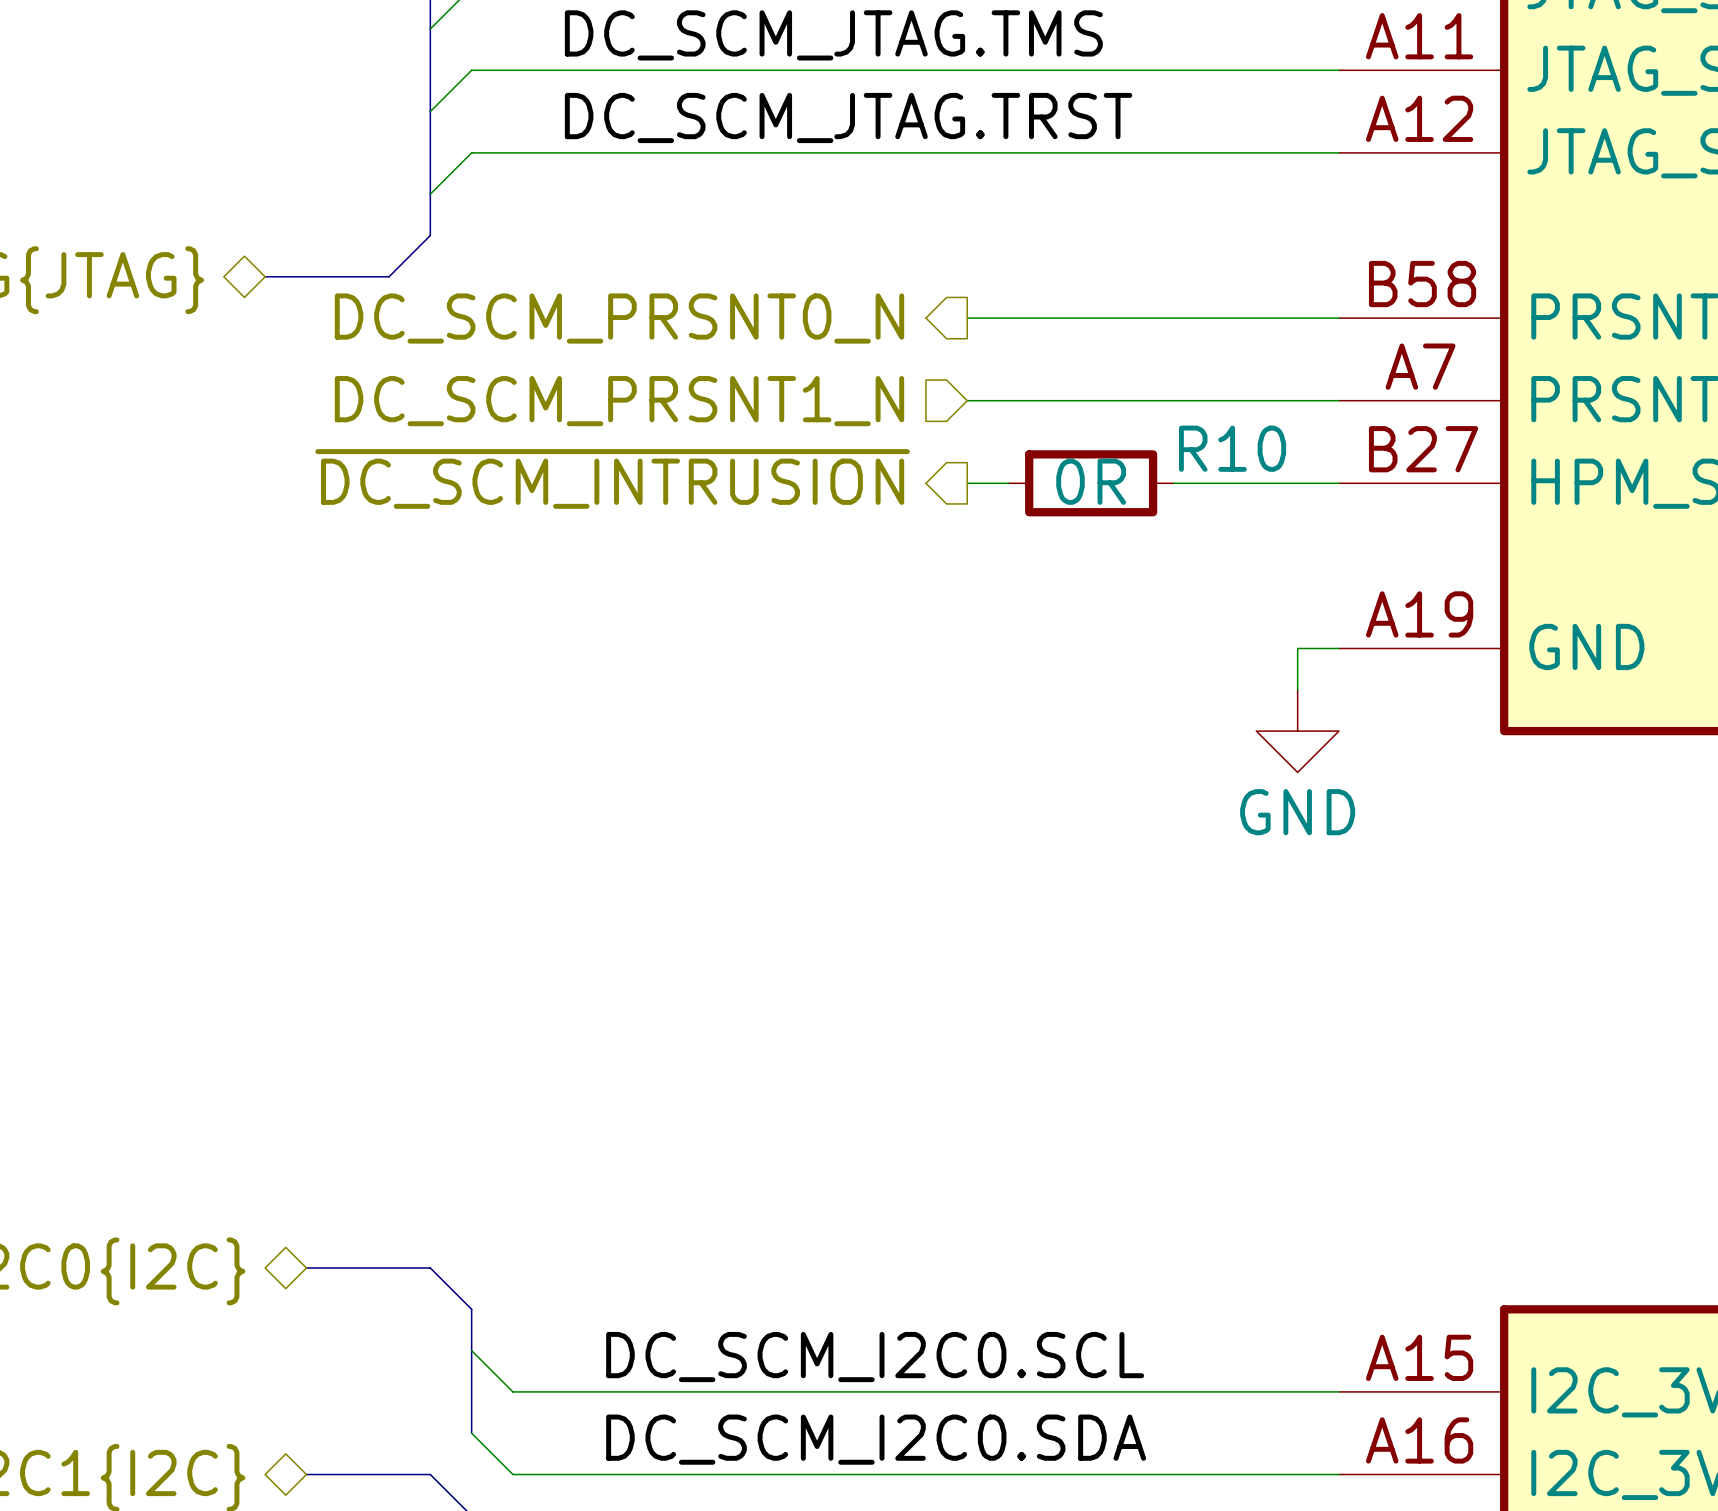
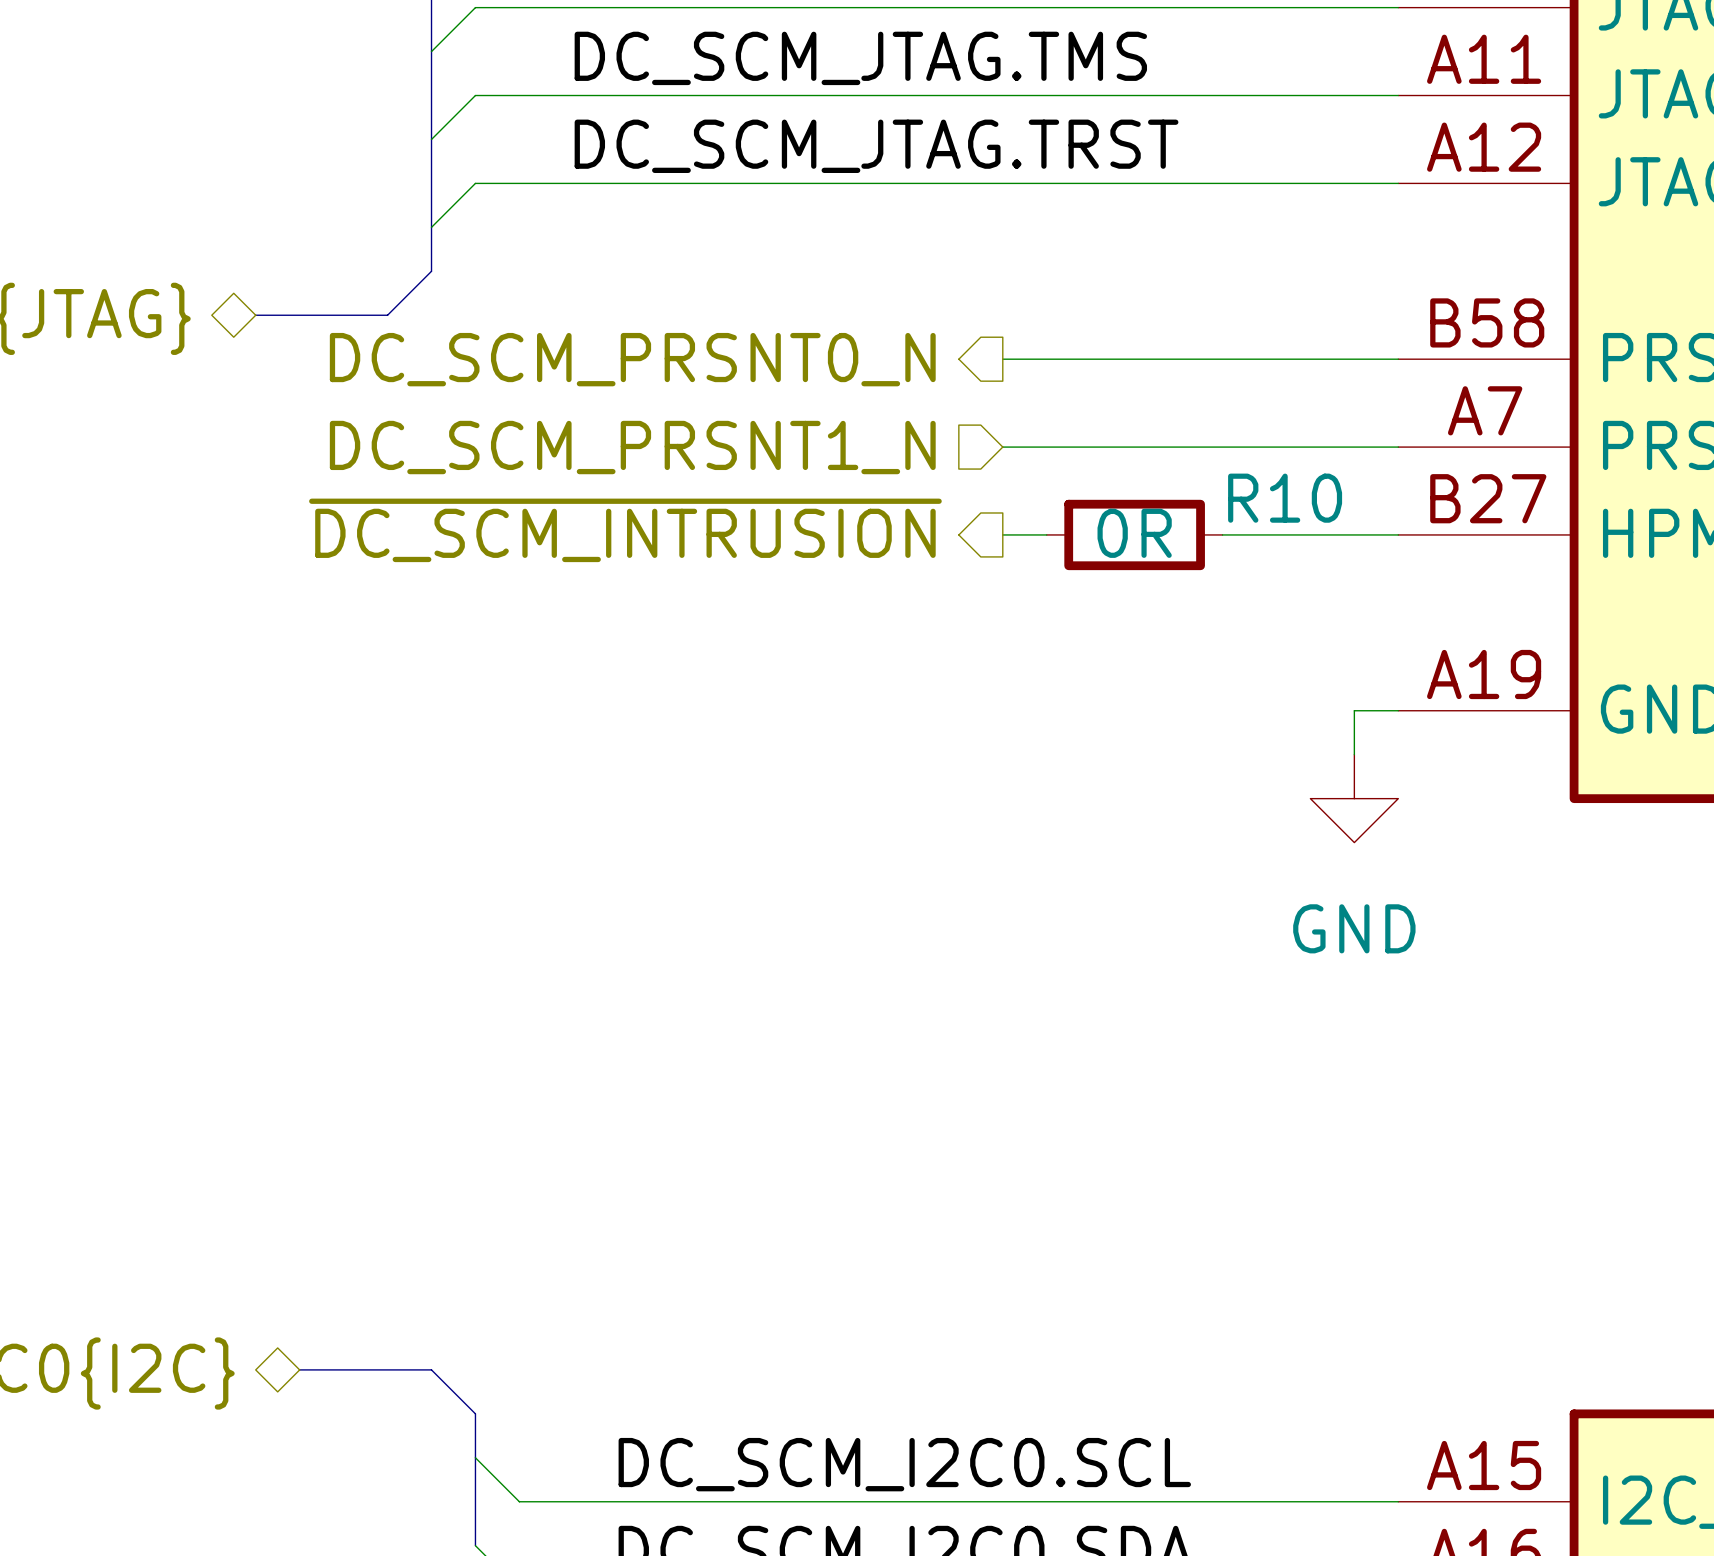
power symbol text position: GND (1297, 812) -> GND (1354, 928)

